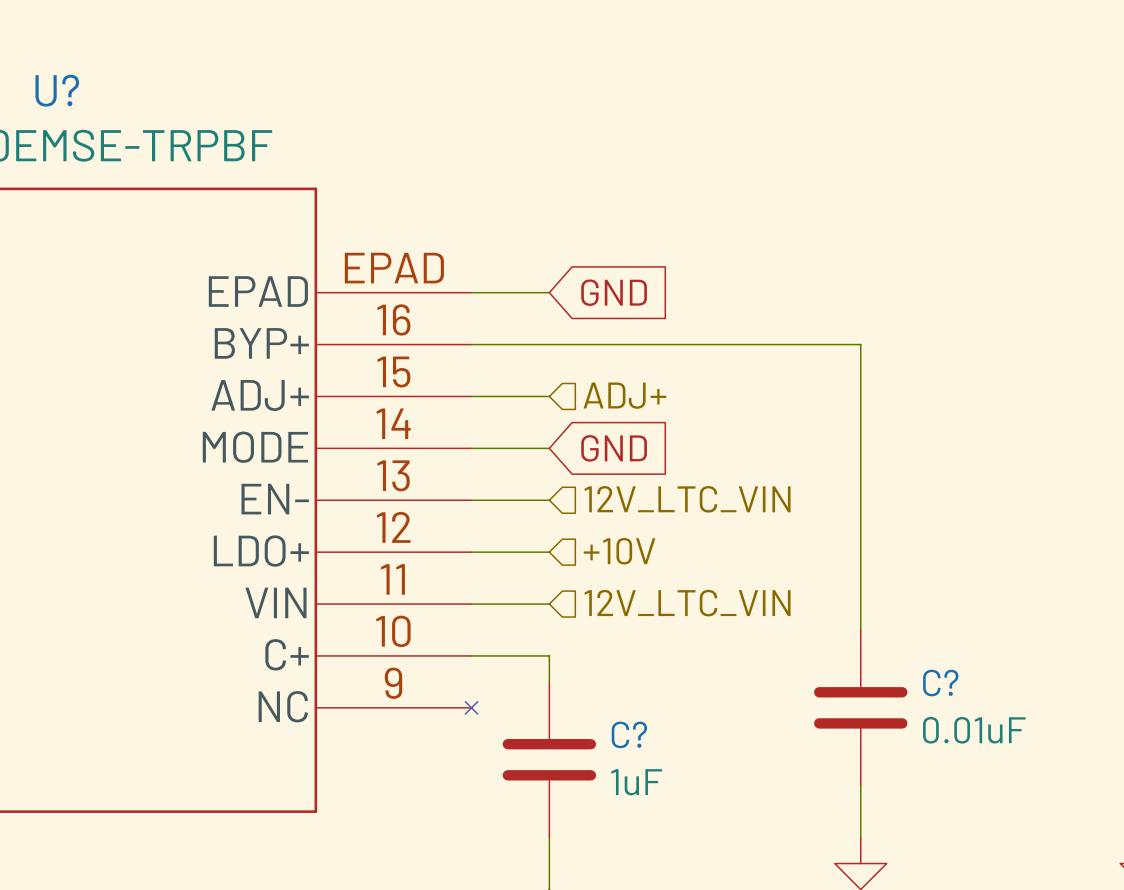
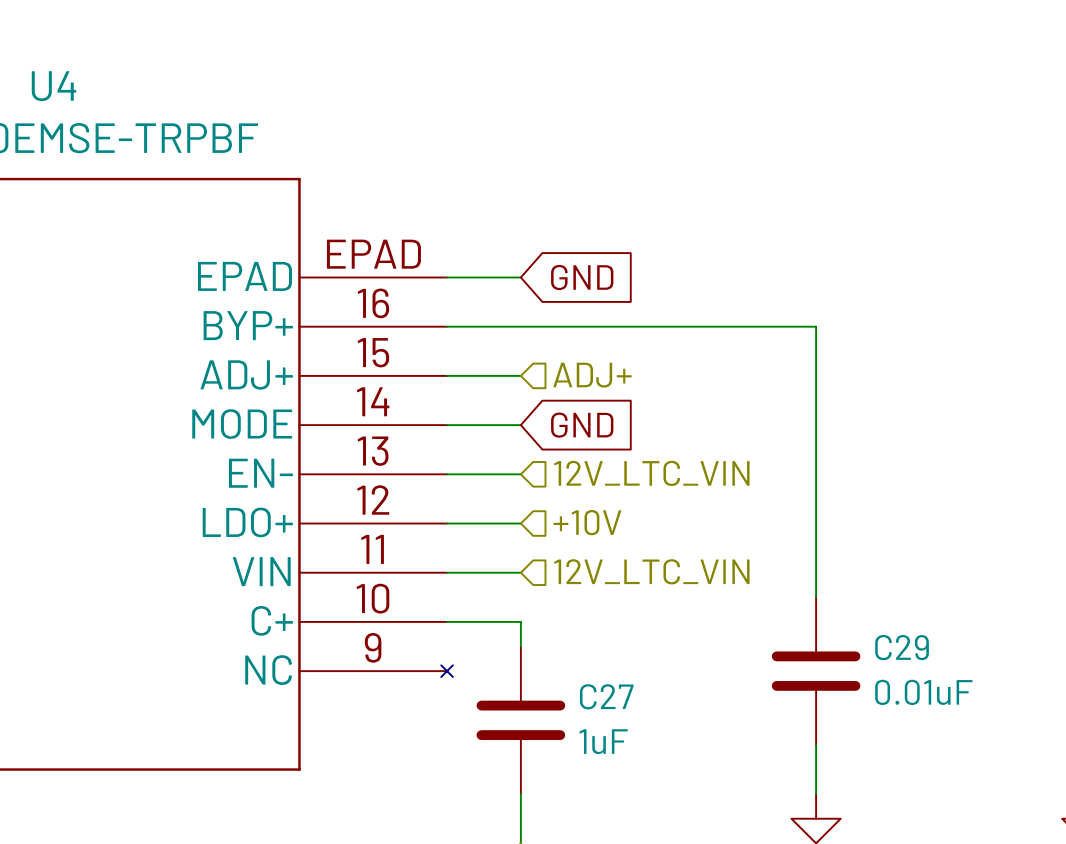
U? name: U? (57, 90) -> U4 (53, 86)
C? name: C? (940, 683) -> C29 (902, 647)
C? name: C? (629, 734) -> C27 (606, 696)

